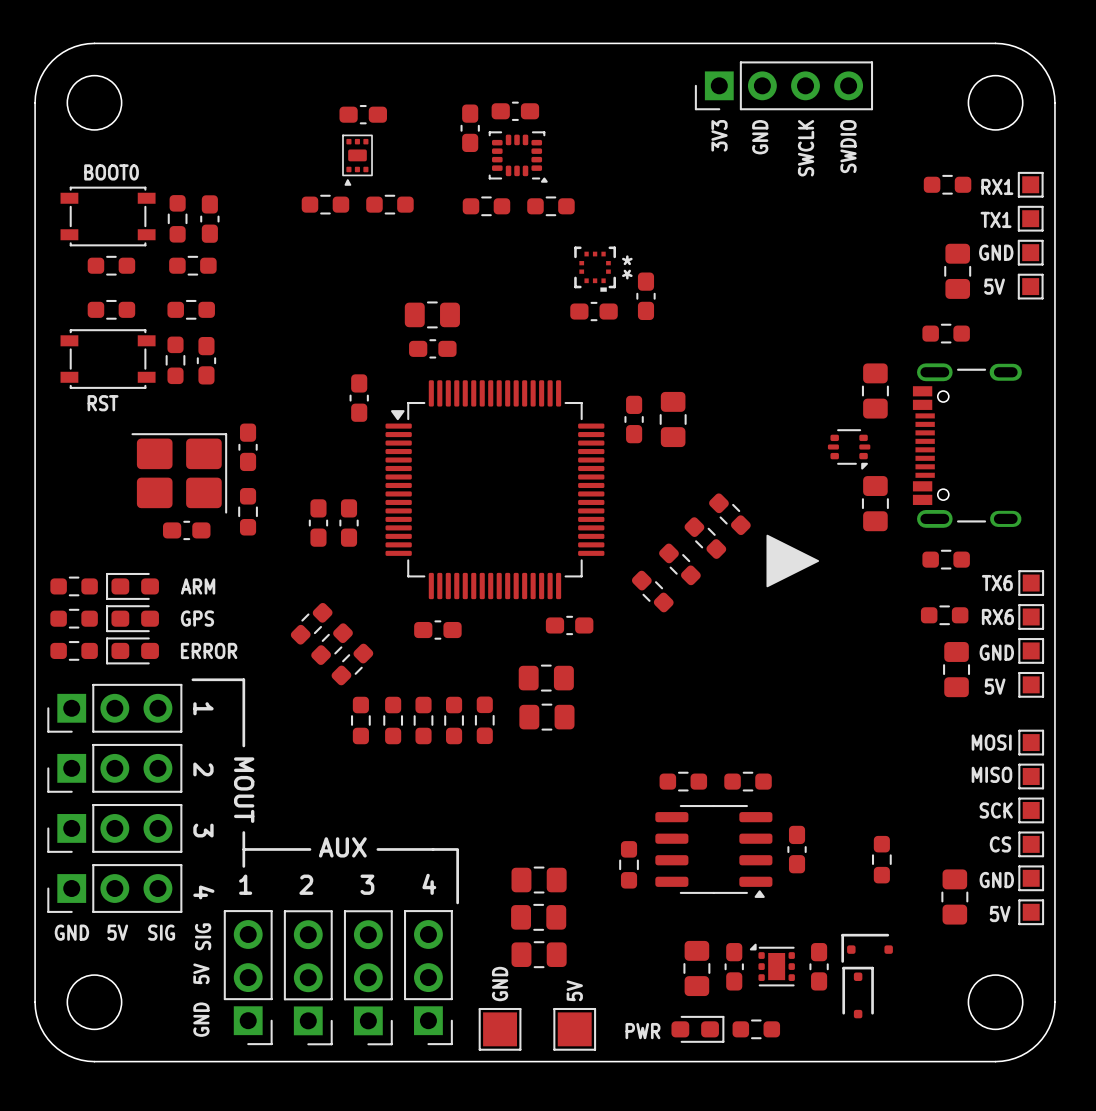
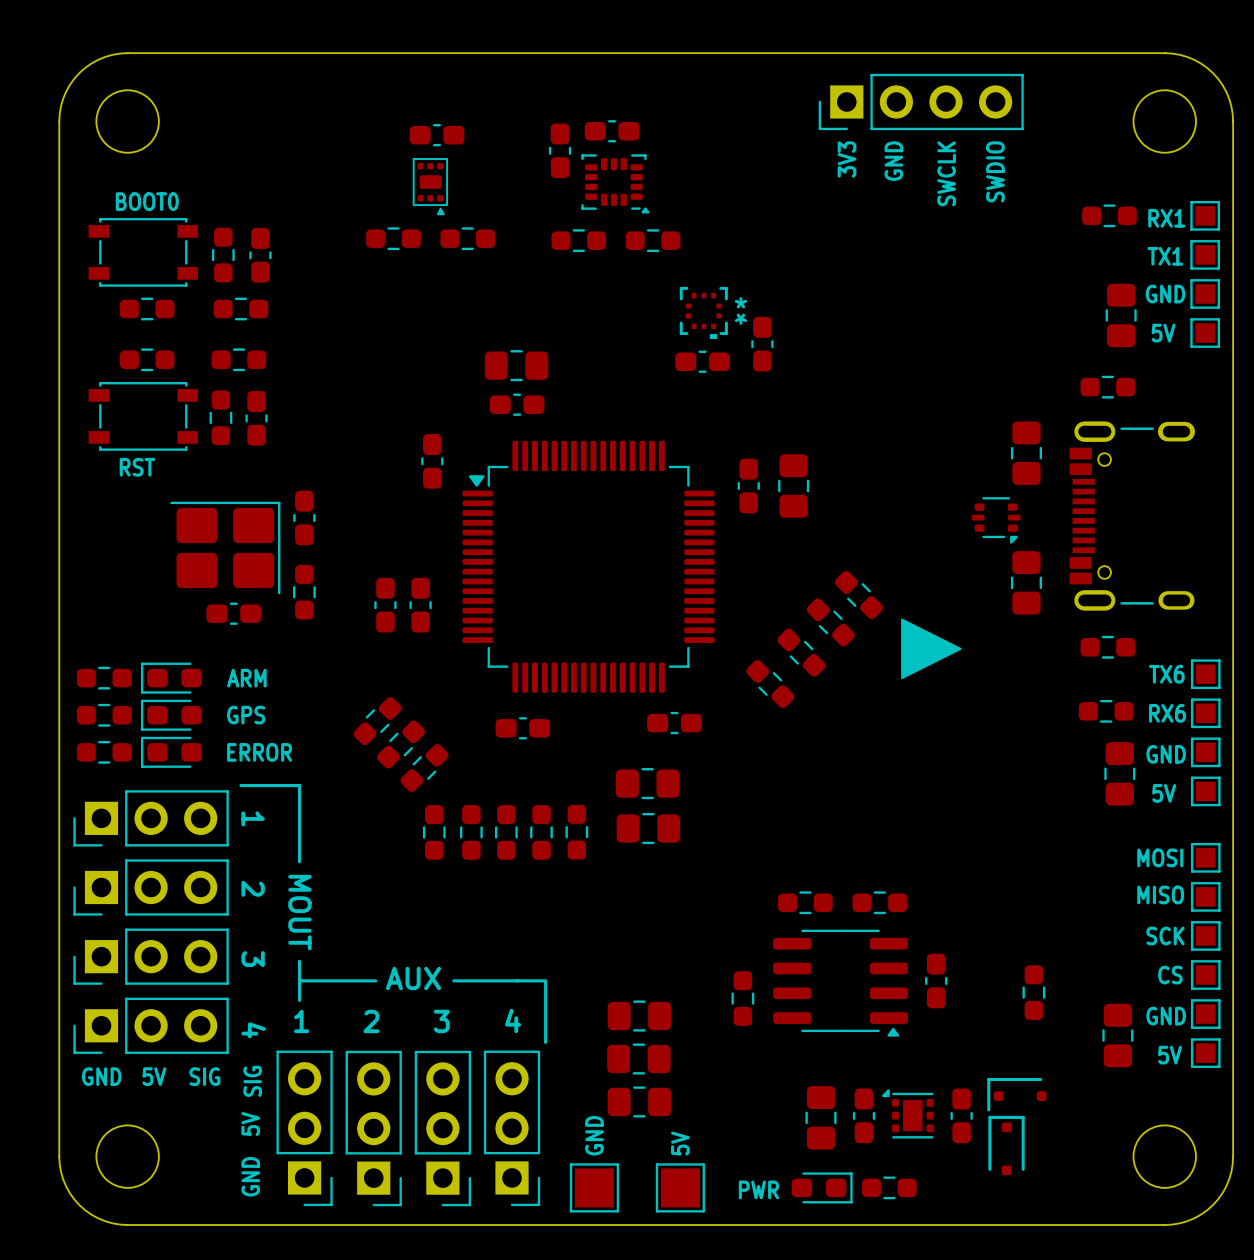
part footprint: [342, 134, 373, 186] -> [412, 158, 449, 216]

